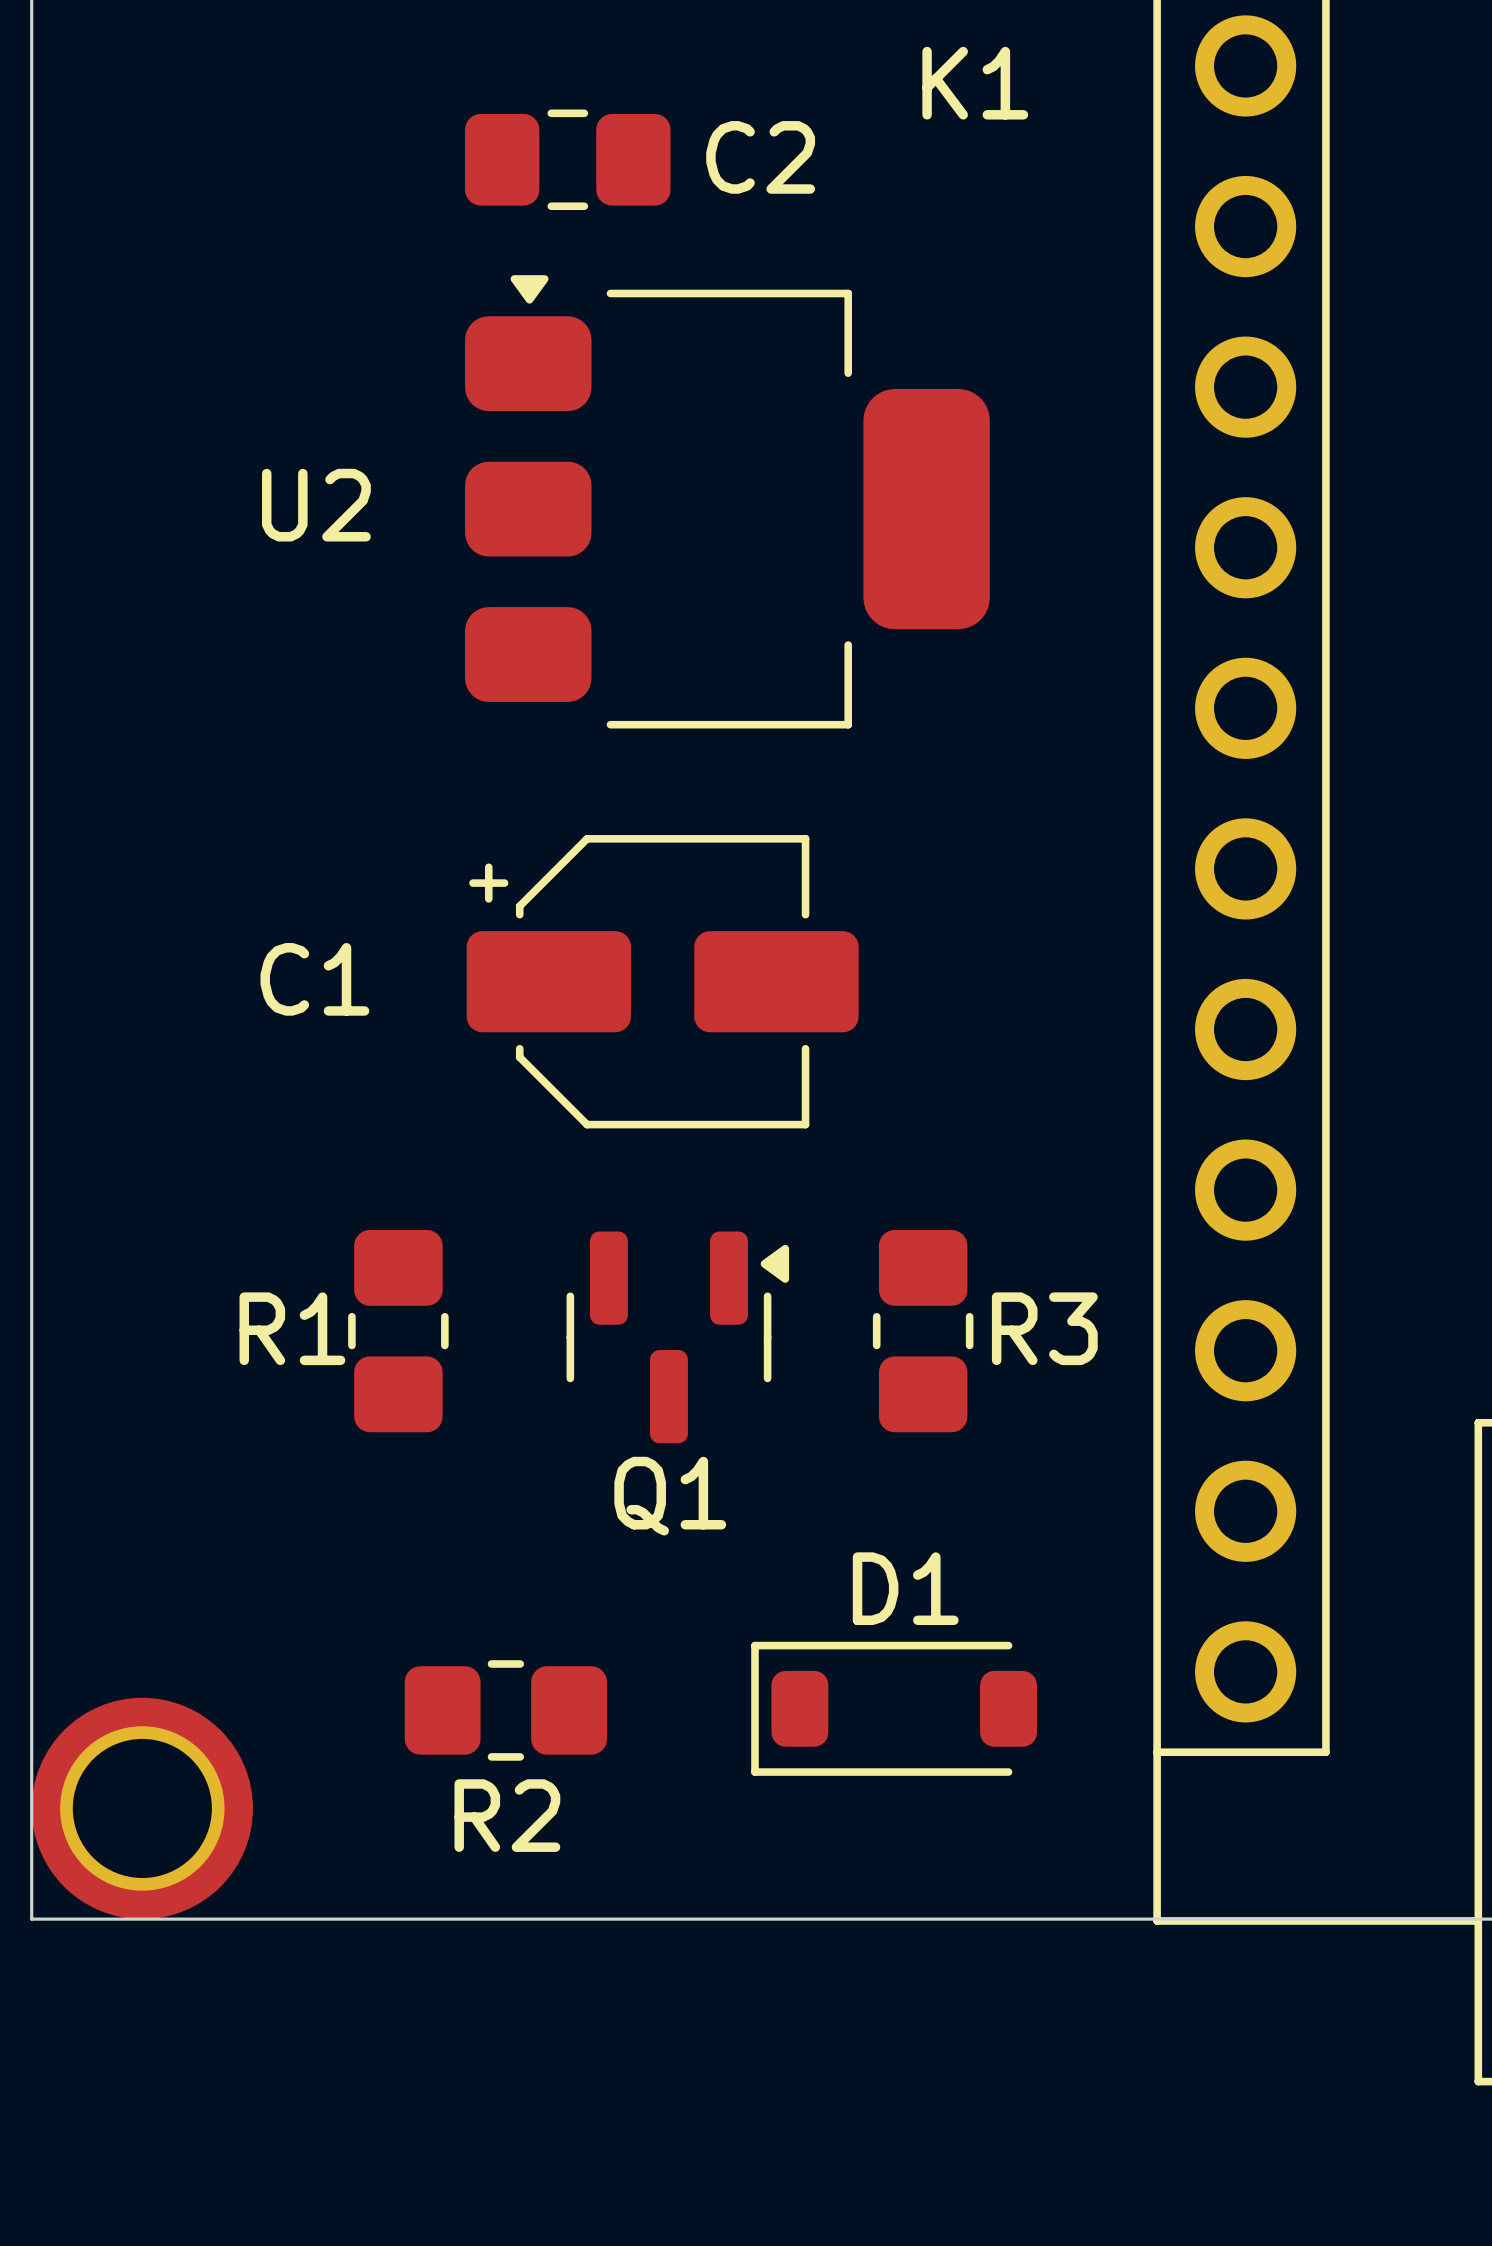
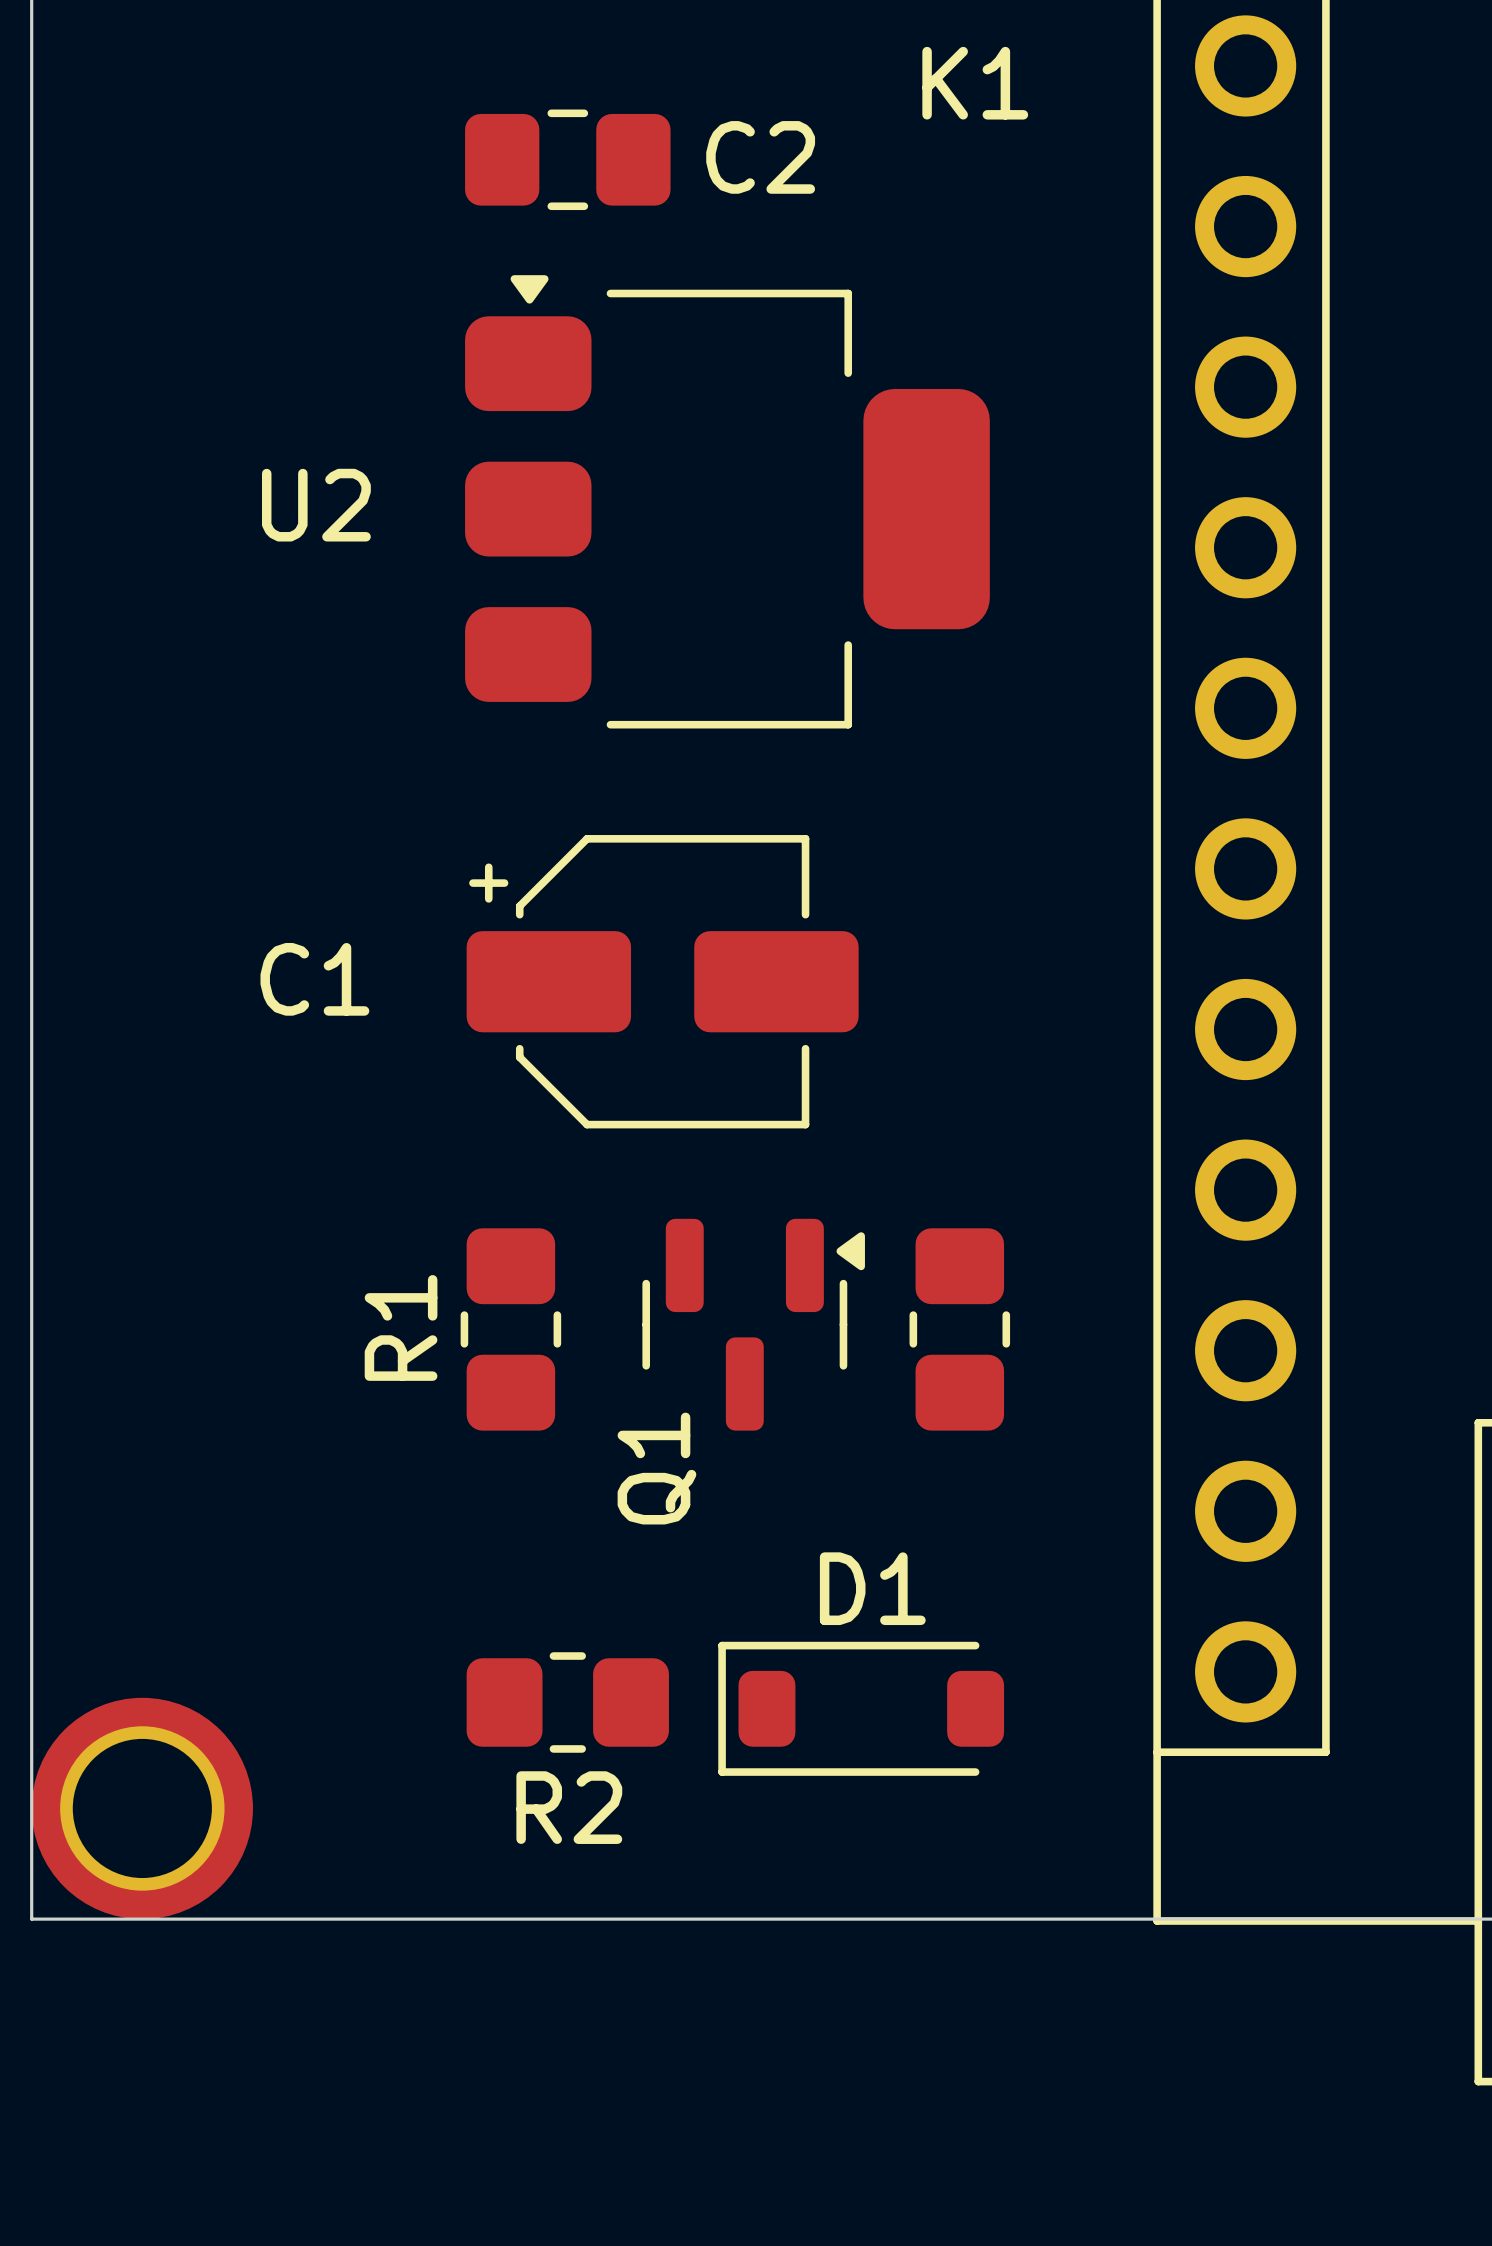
R1 name rotation: 0° (292, 1328) -> 90° counterclockwise (401, 1327)
R3 name: R3 (1044, 1328) -> none
R1 position: (398, 1331) -> (510, 1329)
R3 position: (923, 1331) -> (959, 1329)
Q1 position: (677, 1337) -> (753, 1324)
Q1 name rotation: 0° (670, 1496) -> 90° counterclockwise (656, 1468)
D1 position: (894, 1708) -> (861, 1708)
R2 position: (505, 1710) -> (567, 1702)

